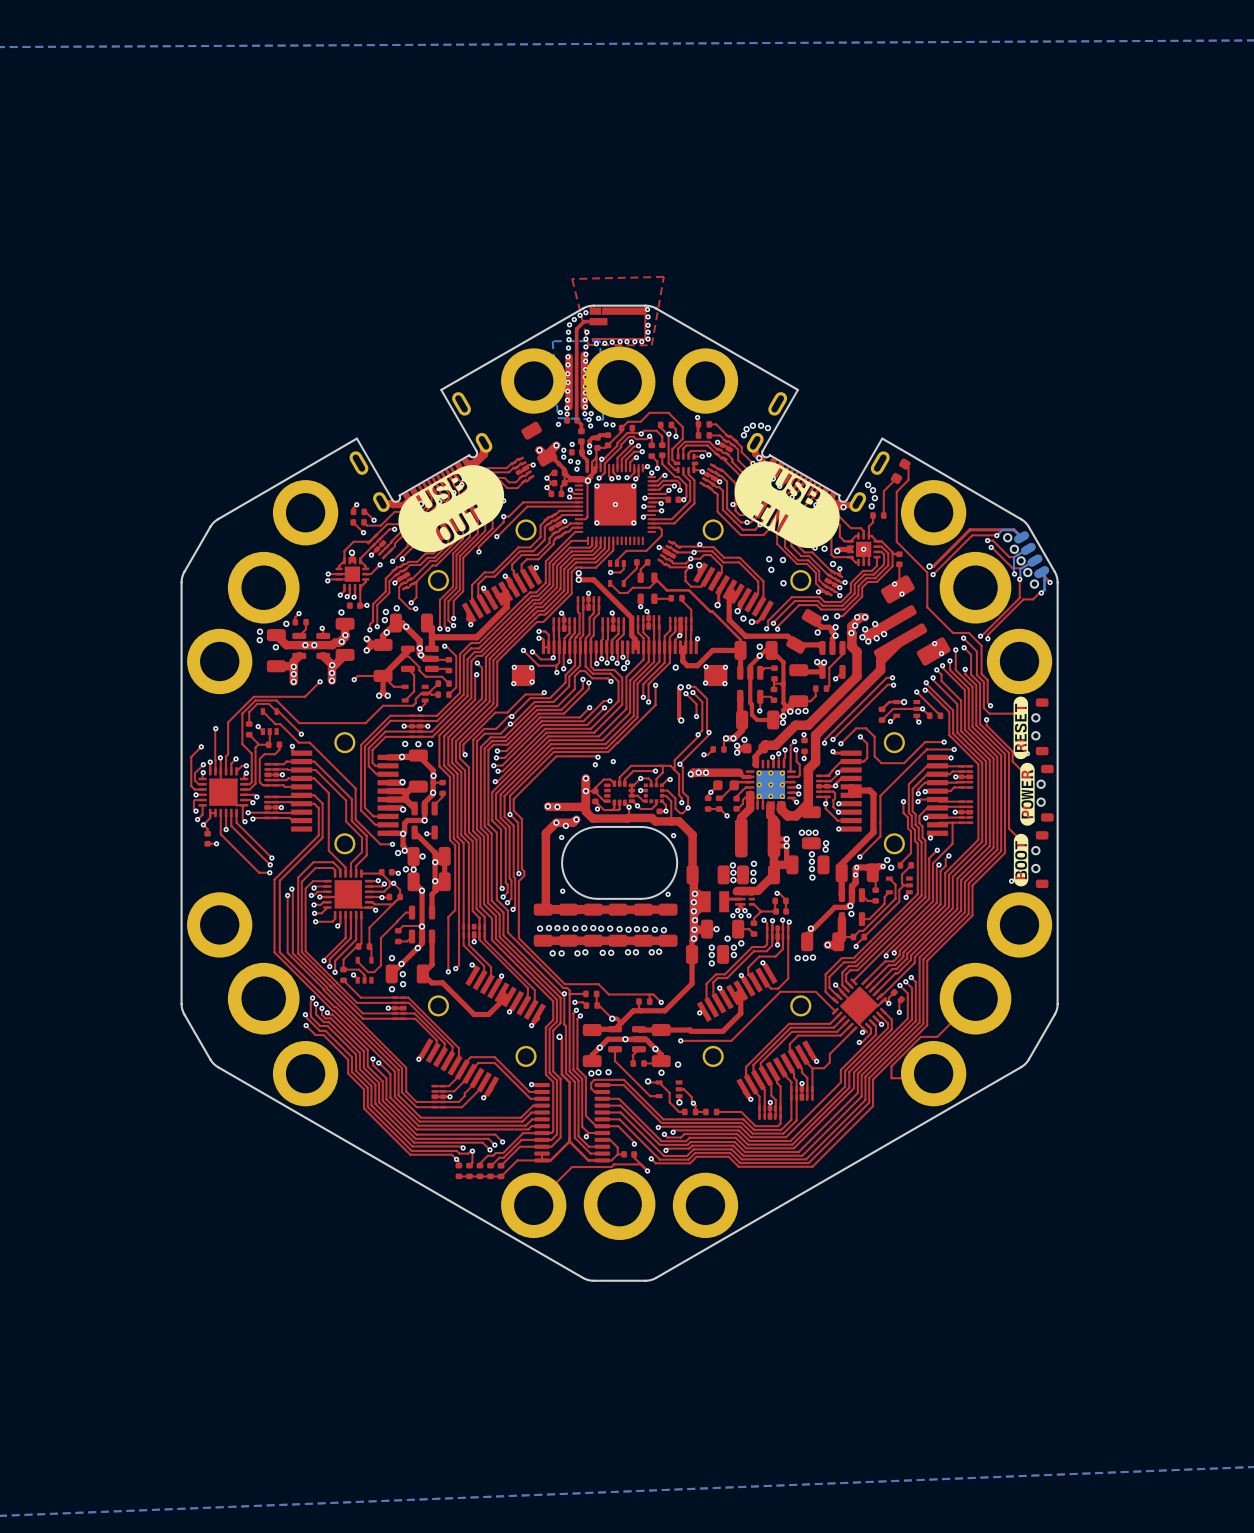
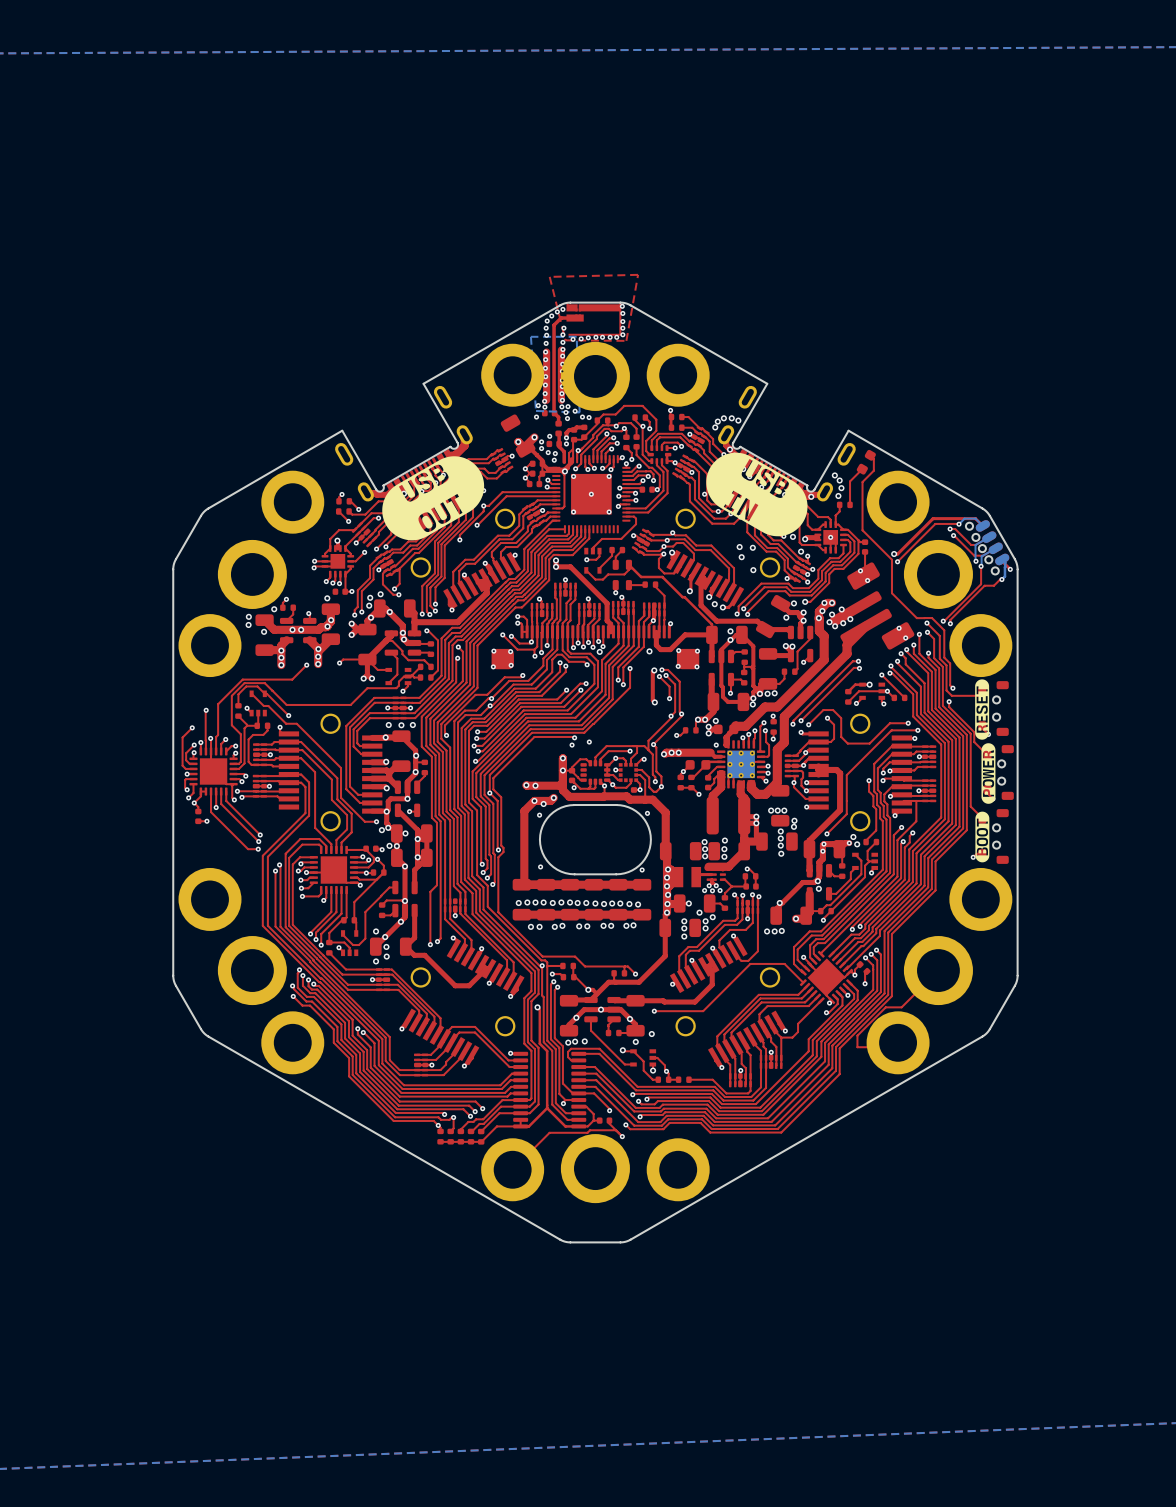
via: none -> (716, 745)

